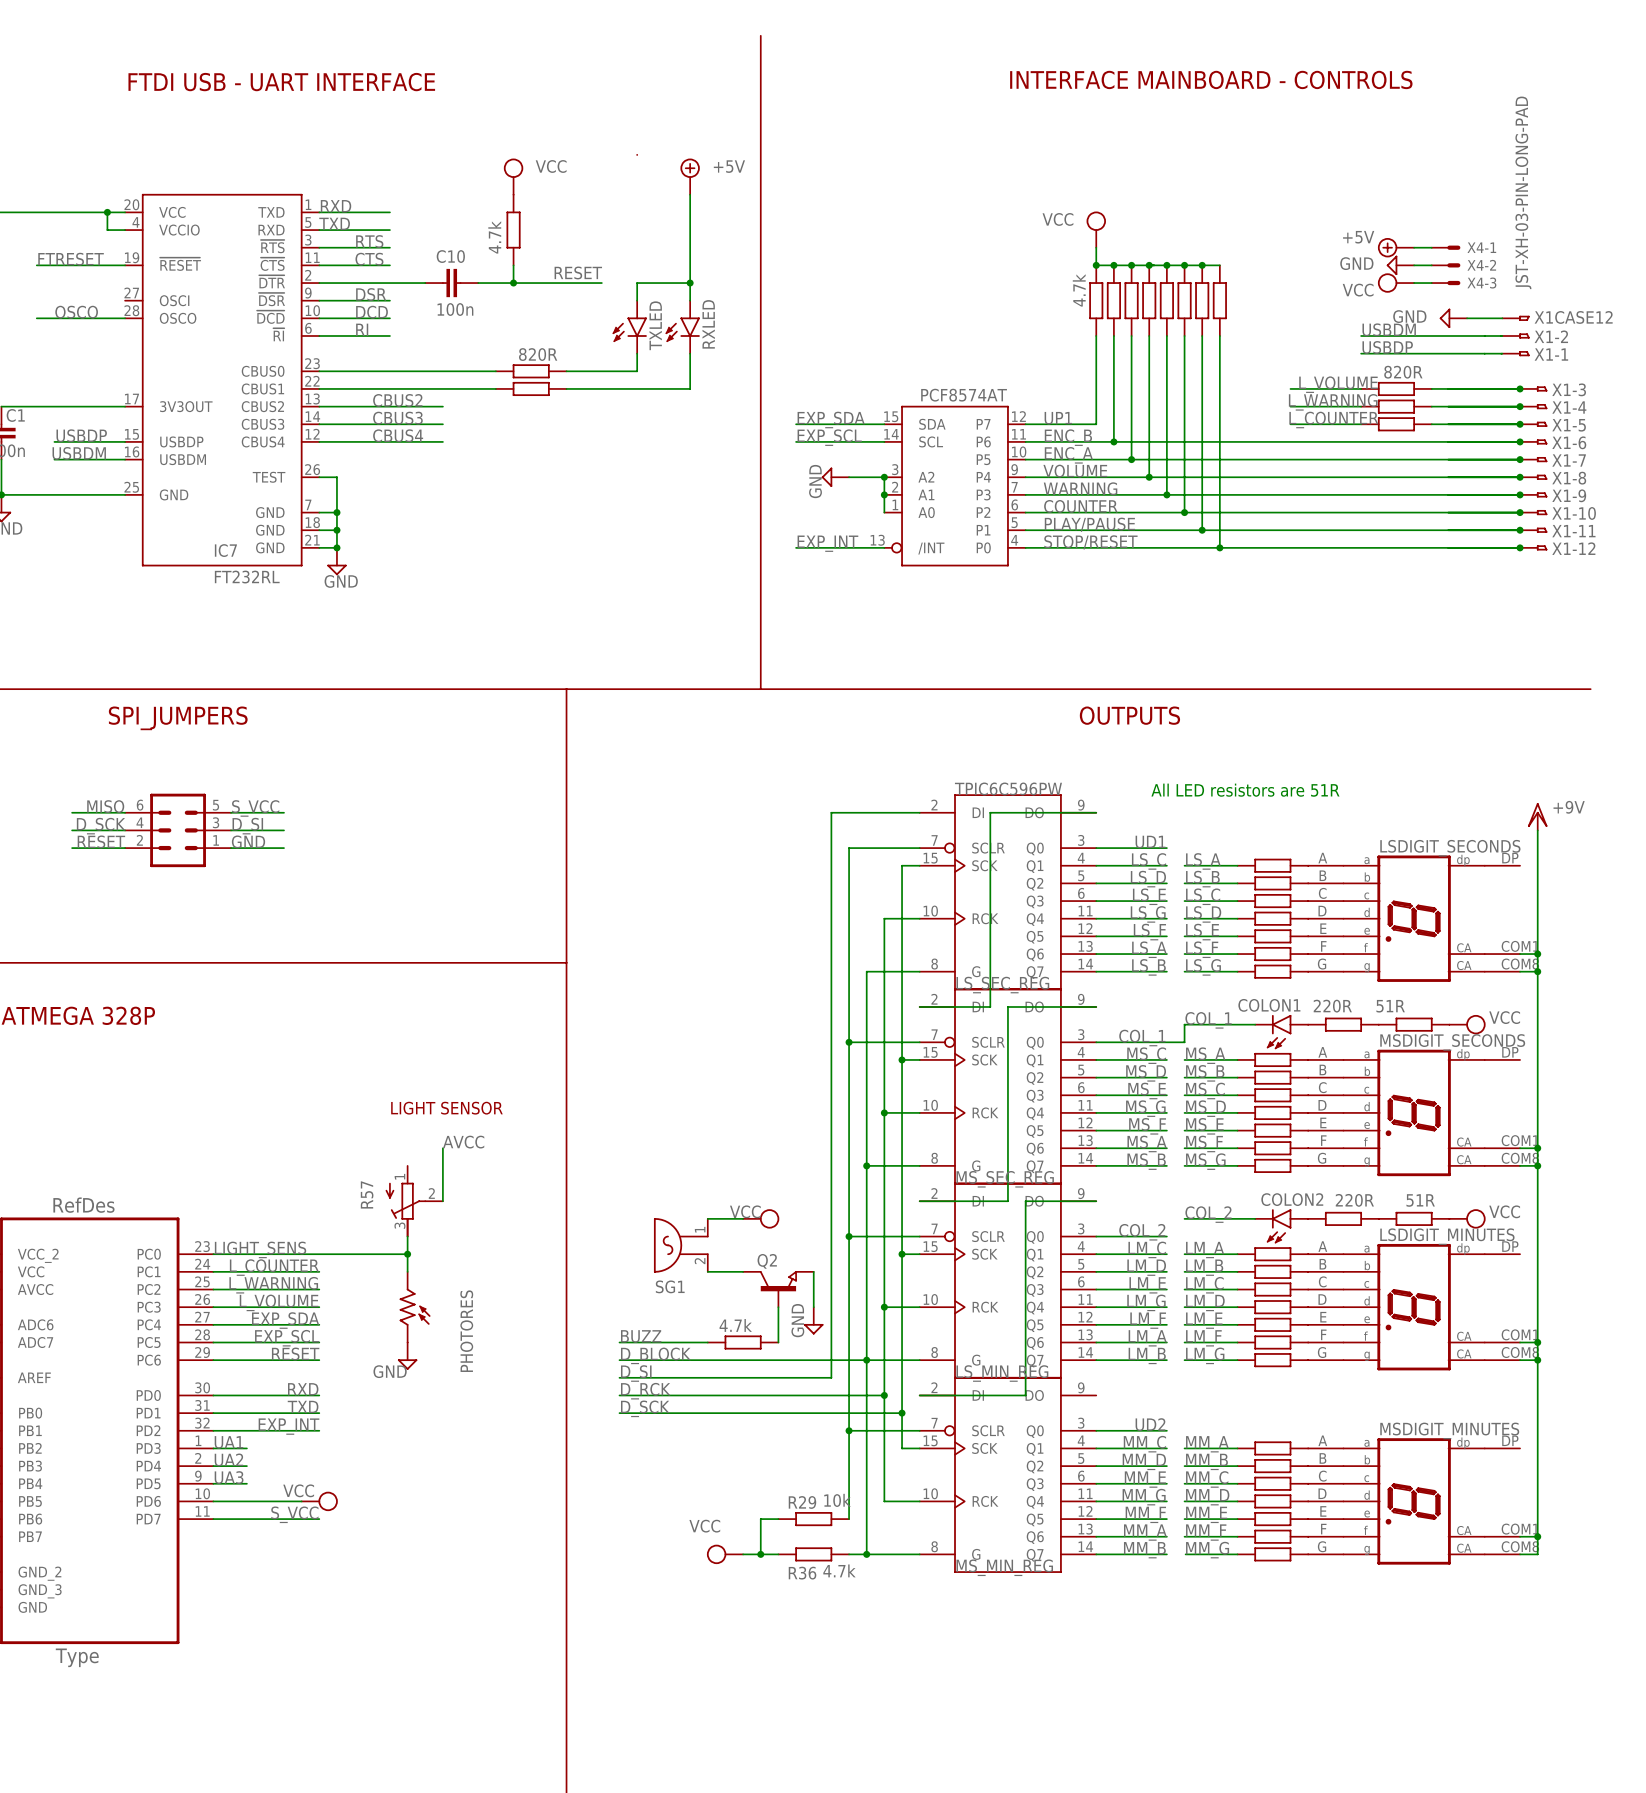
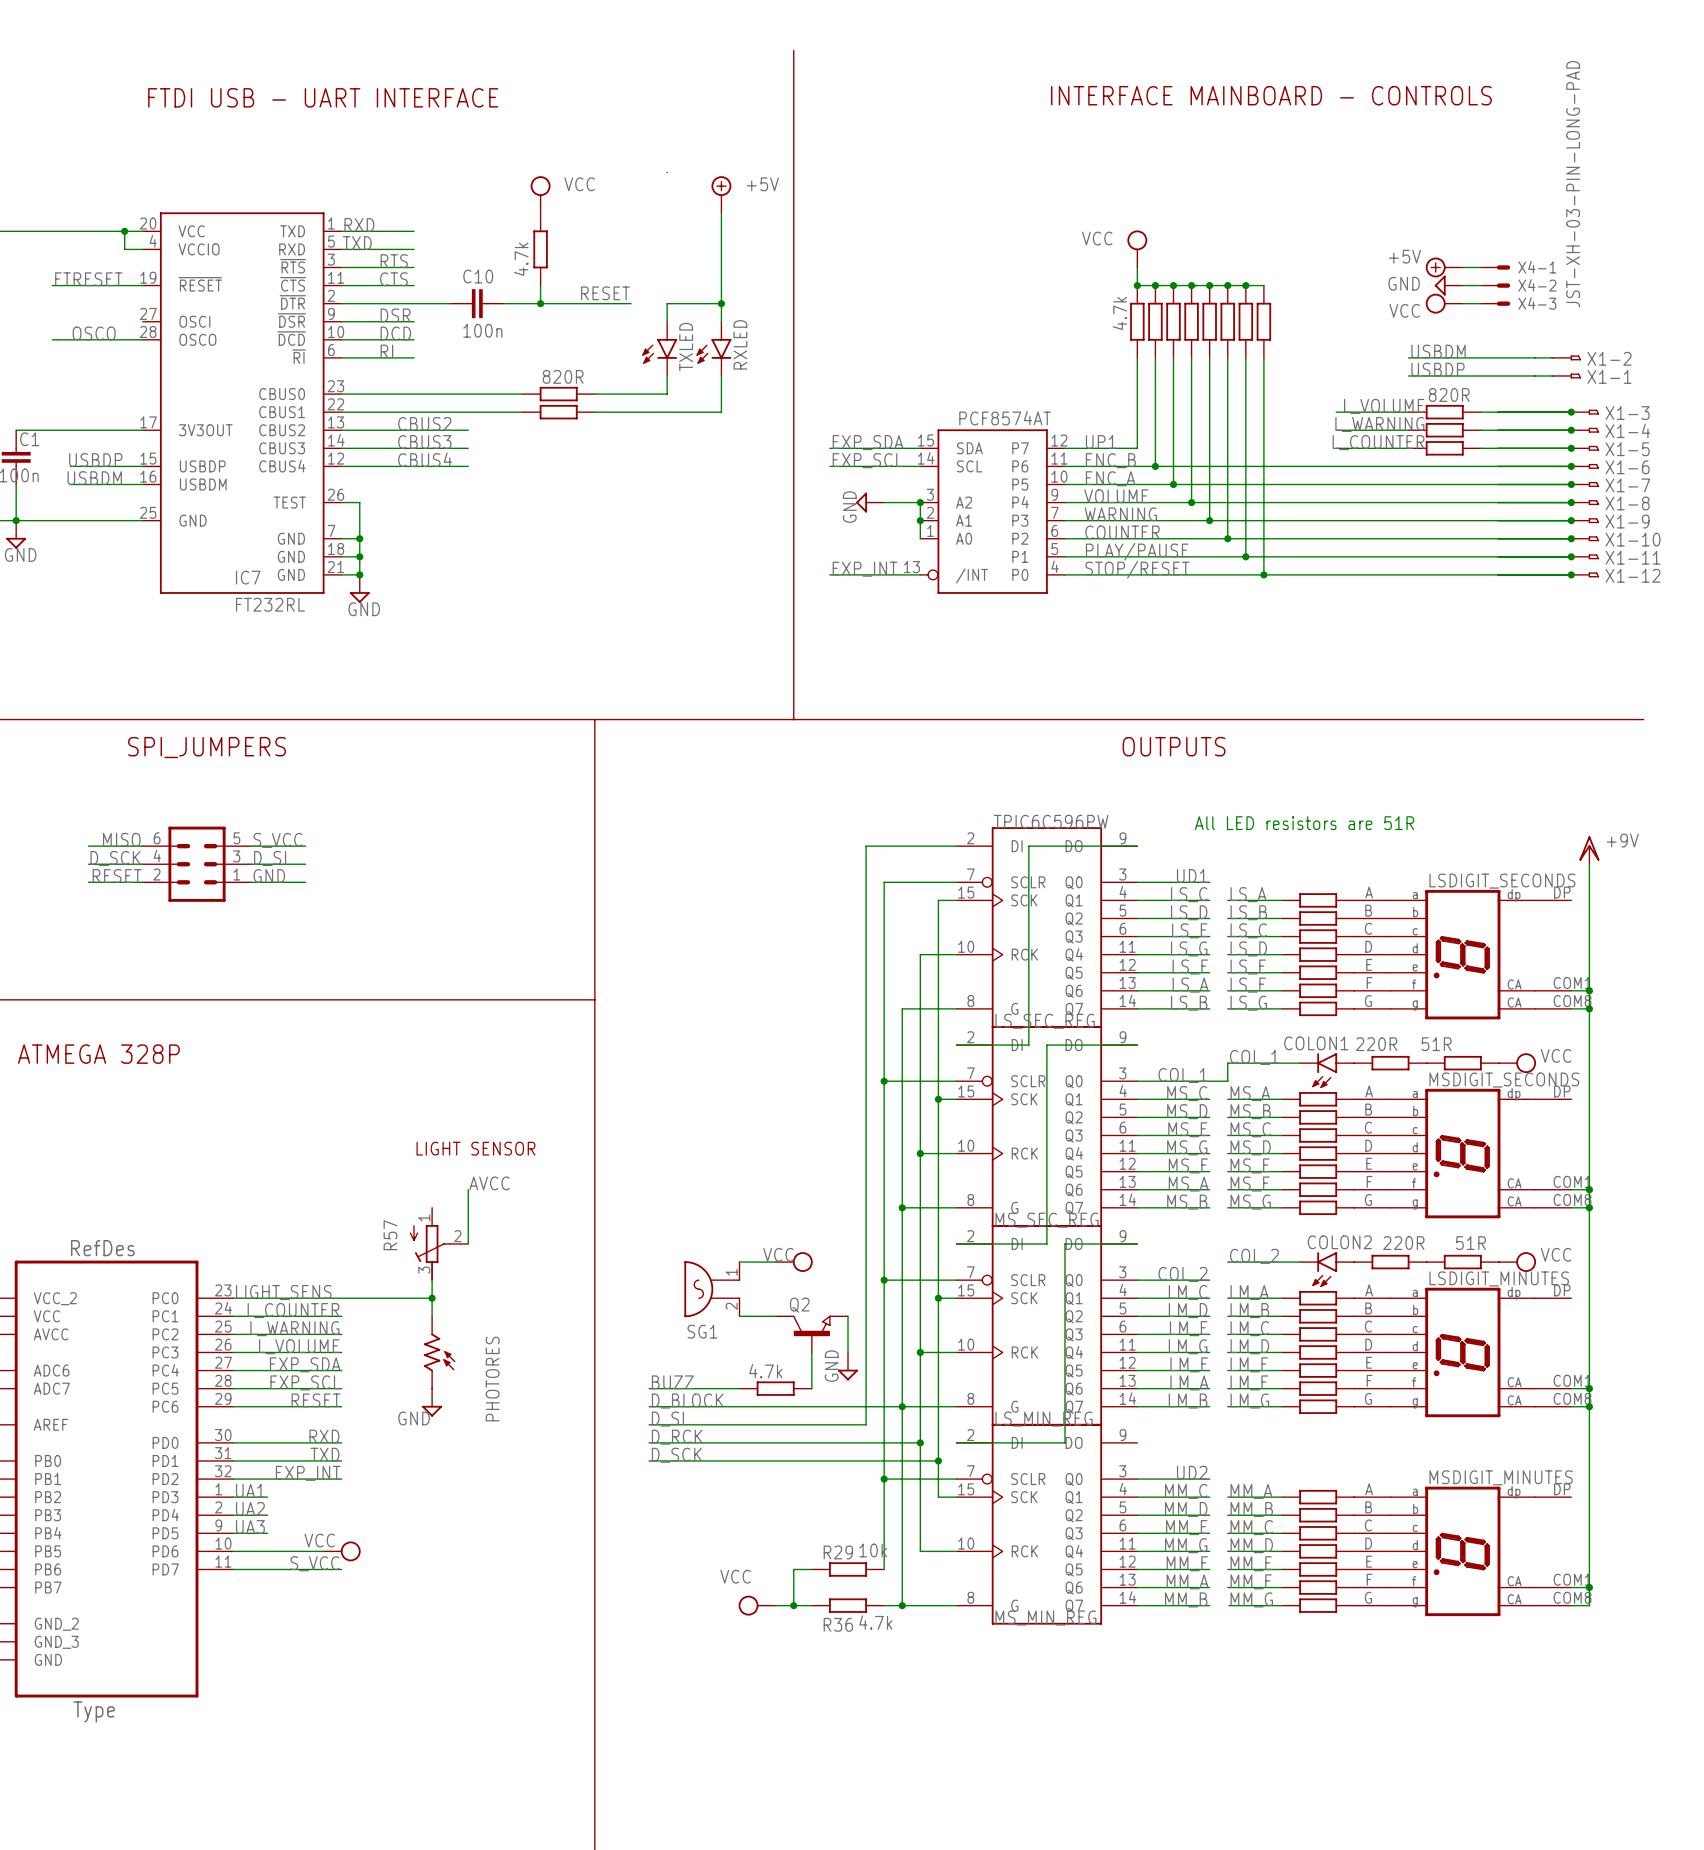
power symbol: GND (1453, 318) -> none
wire: (1467, 318) (1502, 318) -> none
X1CASE12: (1515, 318) -> none

